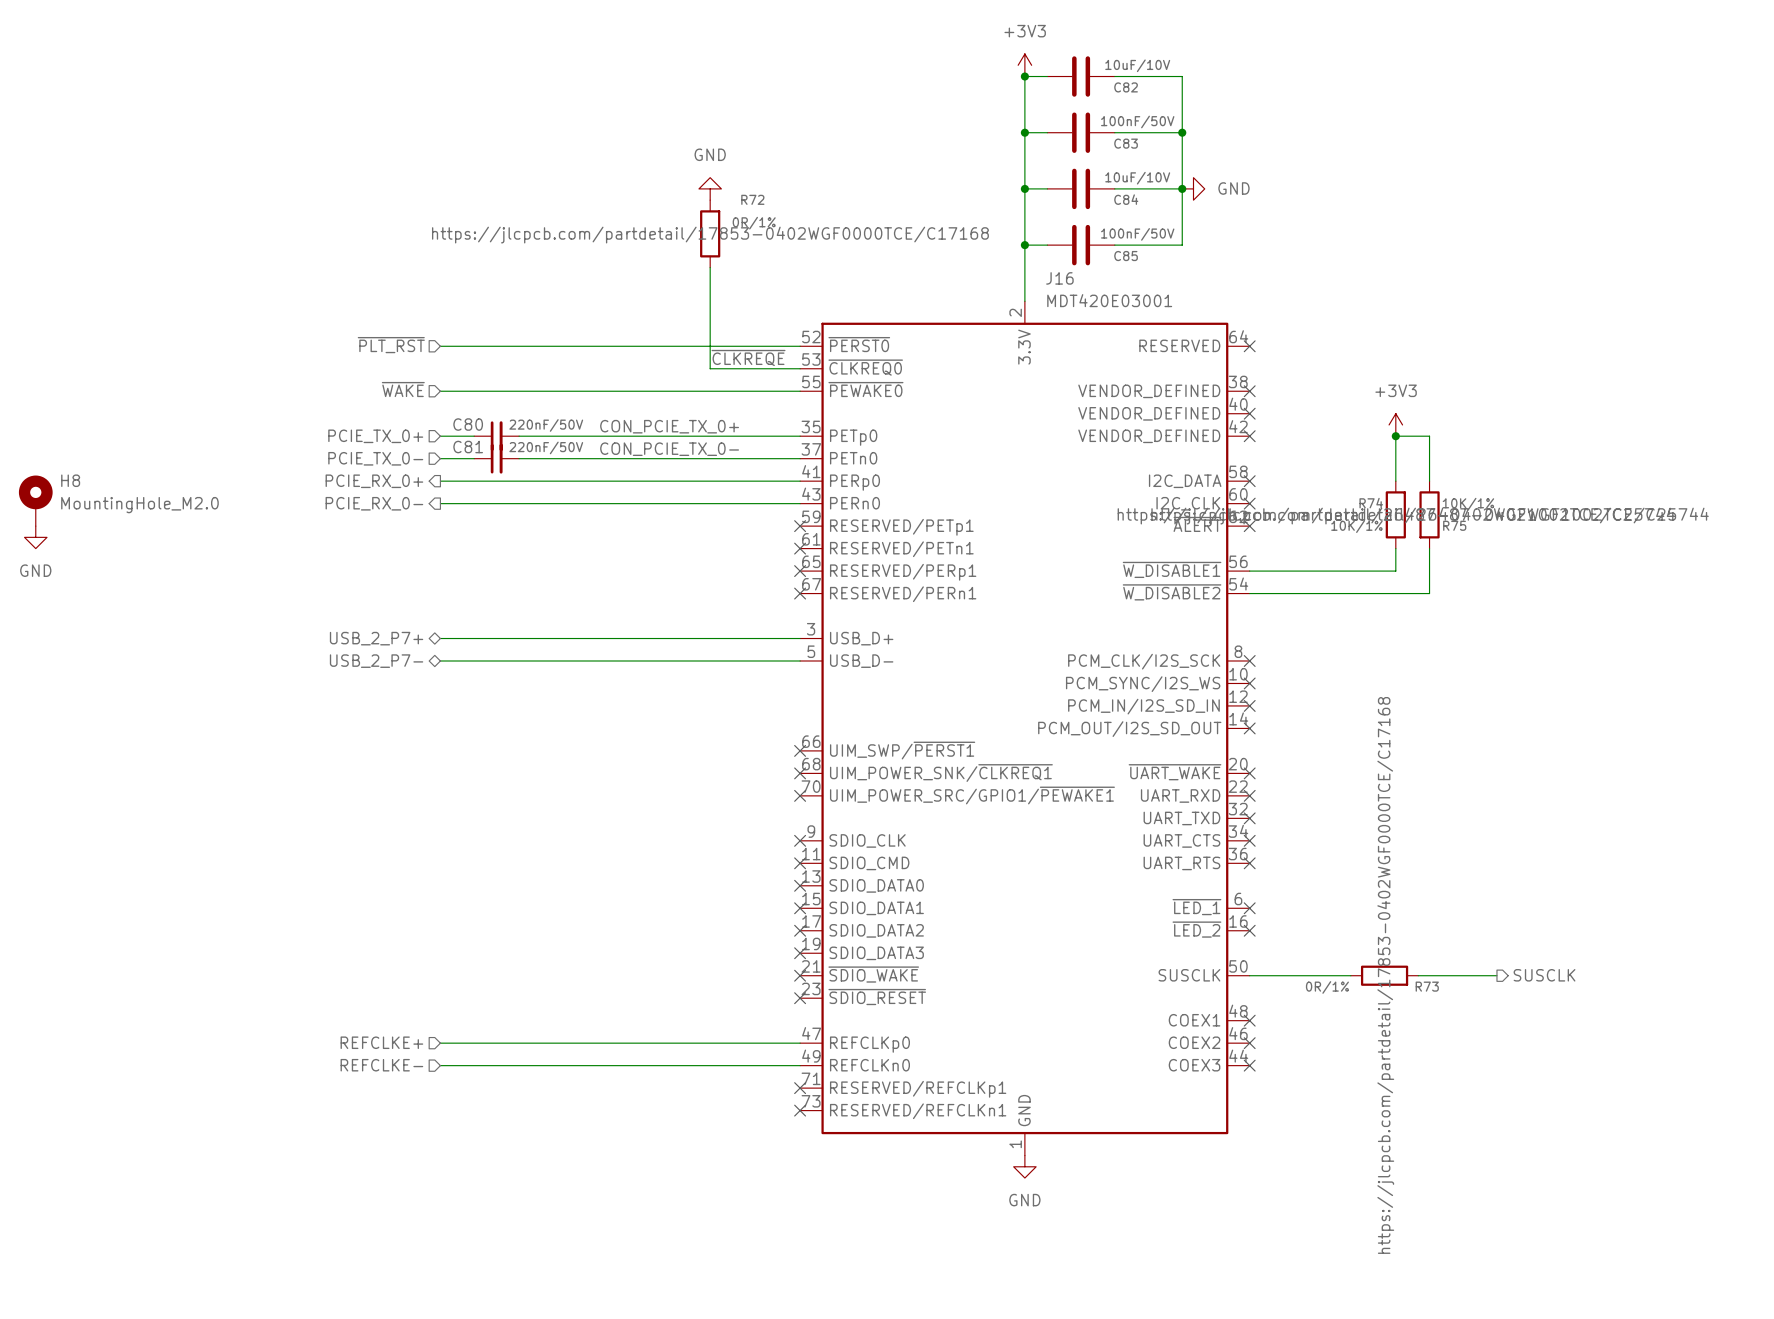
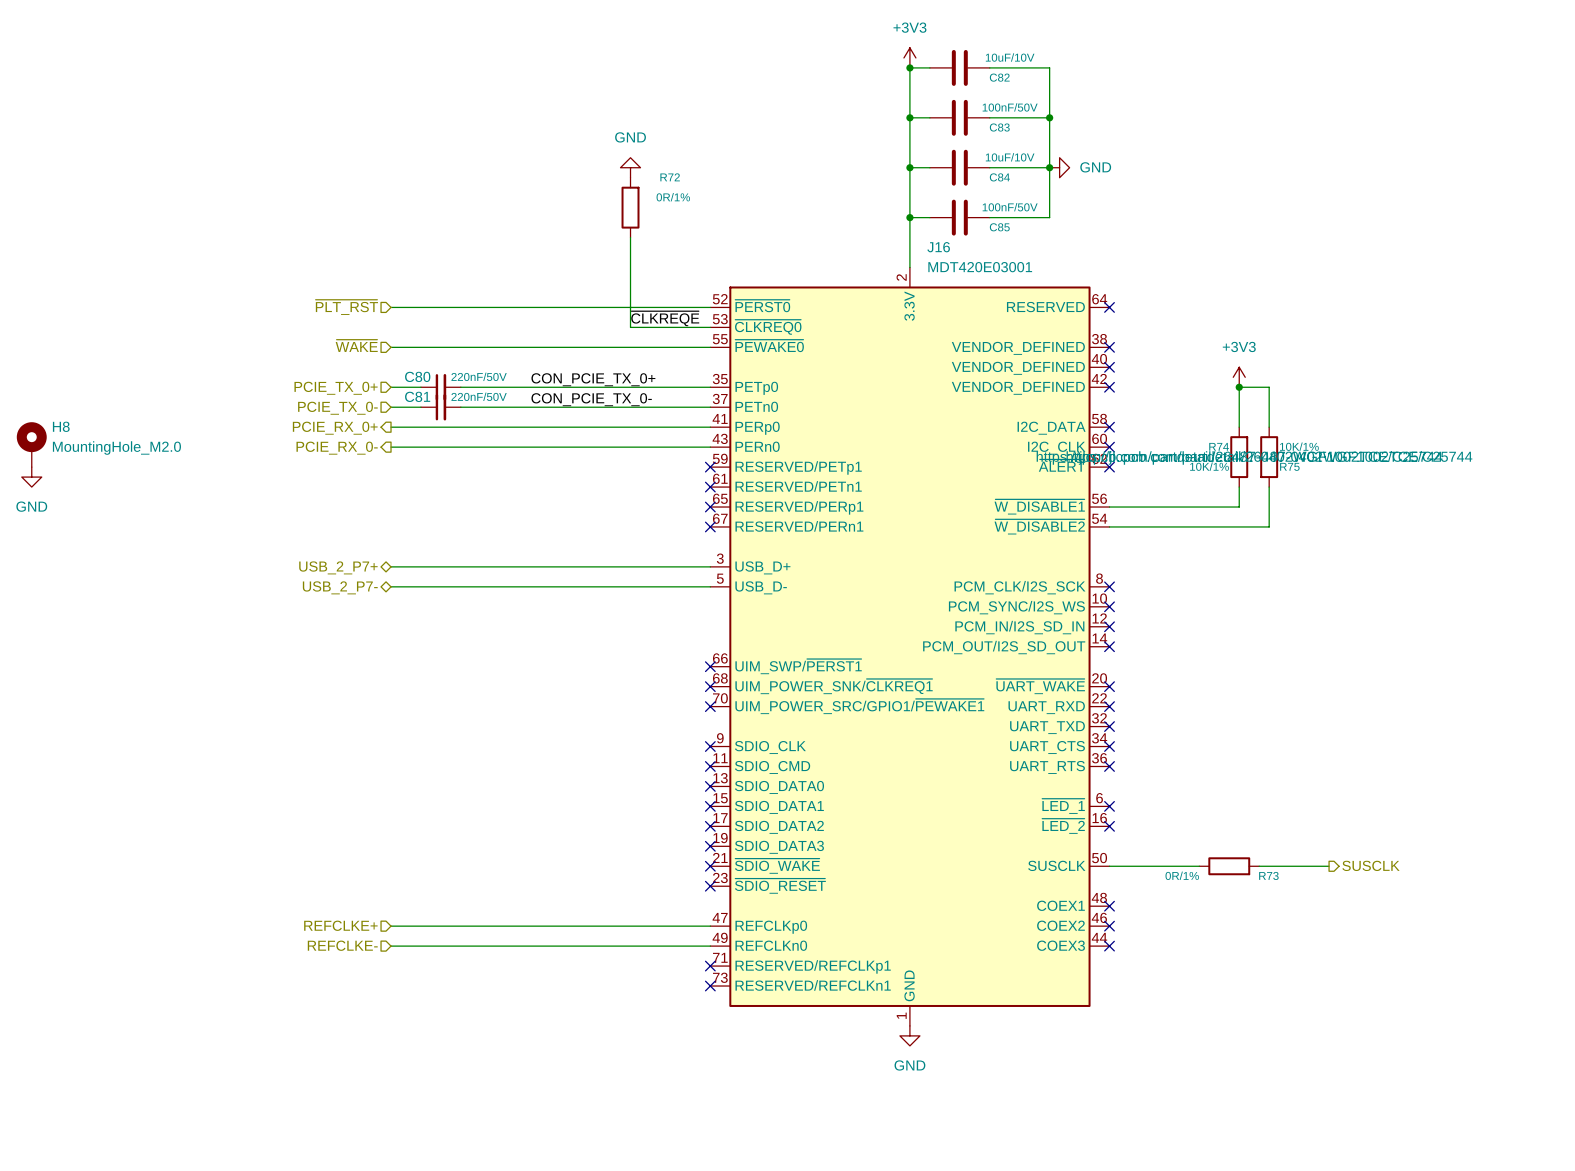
R72 text: https://jlcpcb.com/partdetail/17853-0402WGF0000TCE/C17168 (710, 235) -> none
R73 text: https://jlcpcb.com/partdetail/17853-0402WGF0000TCE/C17168 (1385, 975) -> none

